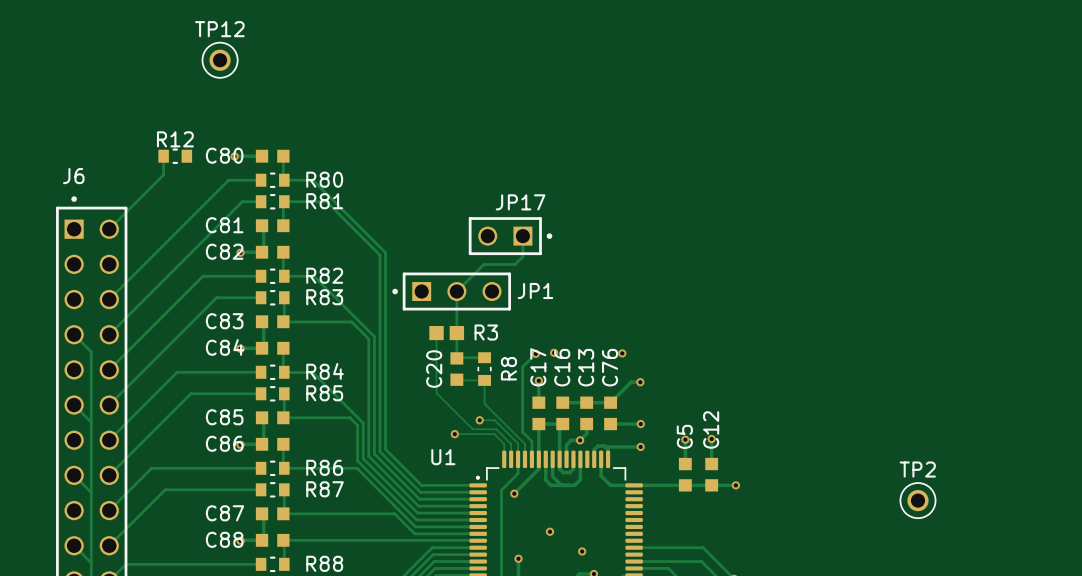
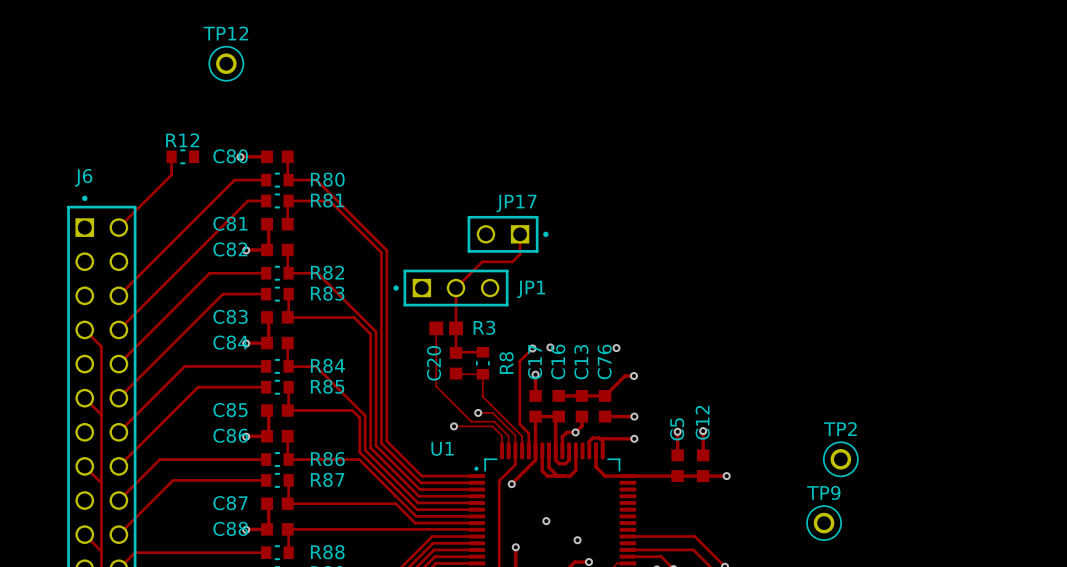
TP2 position: (917, 500) -> (840, 459)
TP9: none -> (824, 523)

